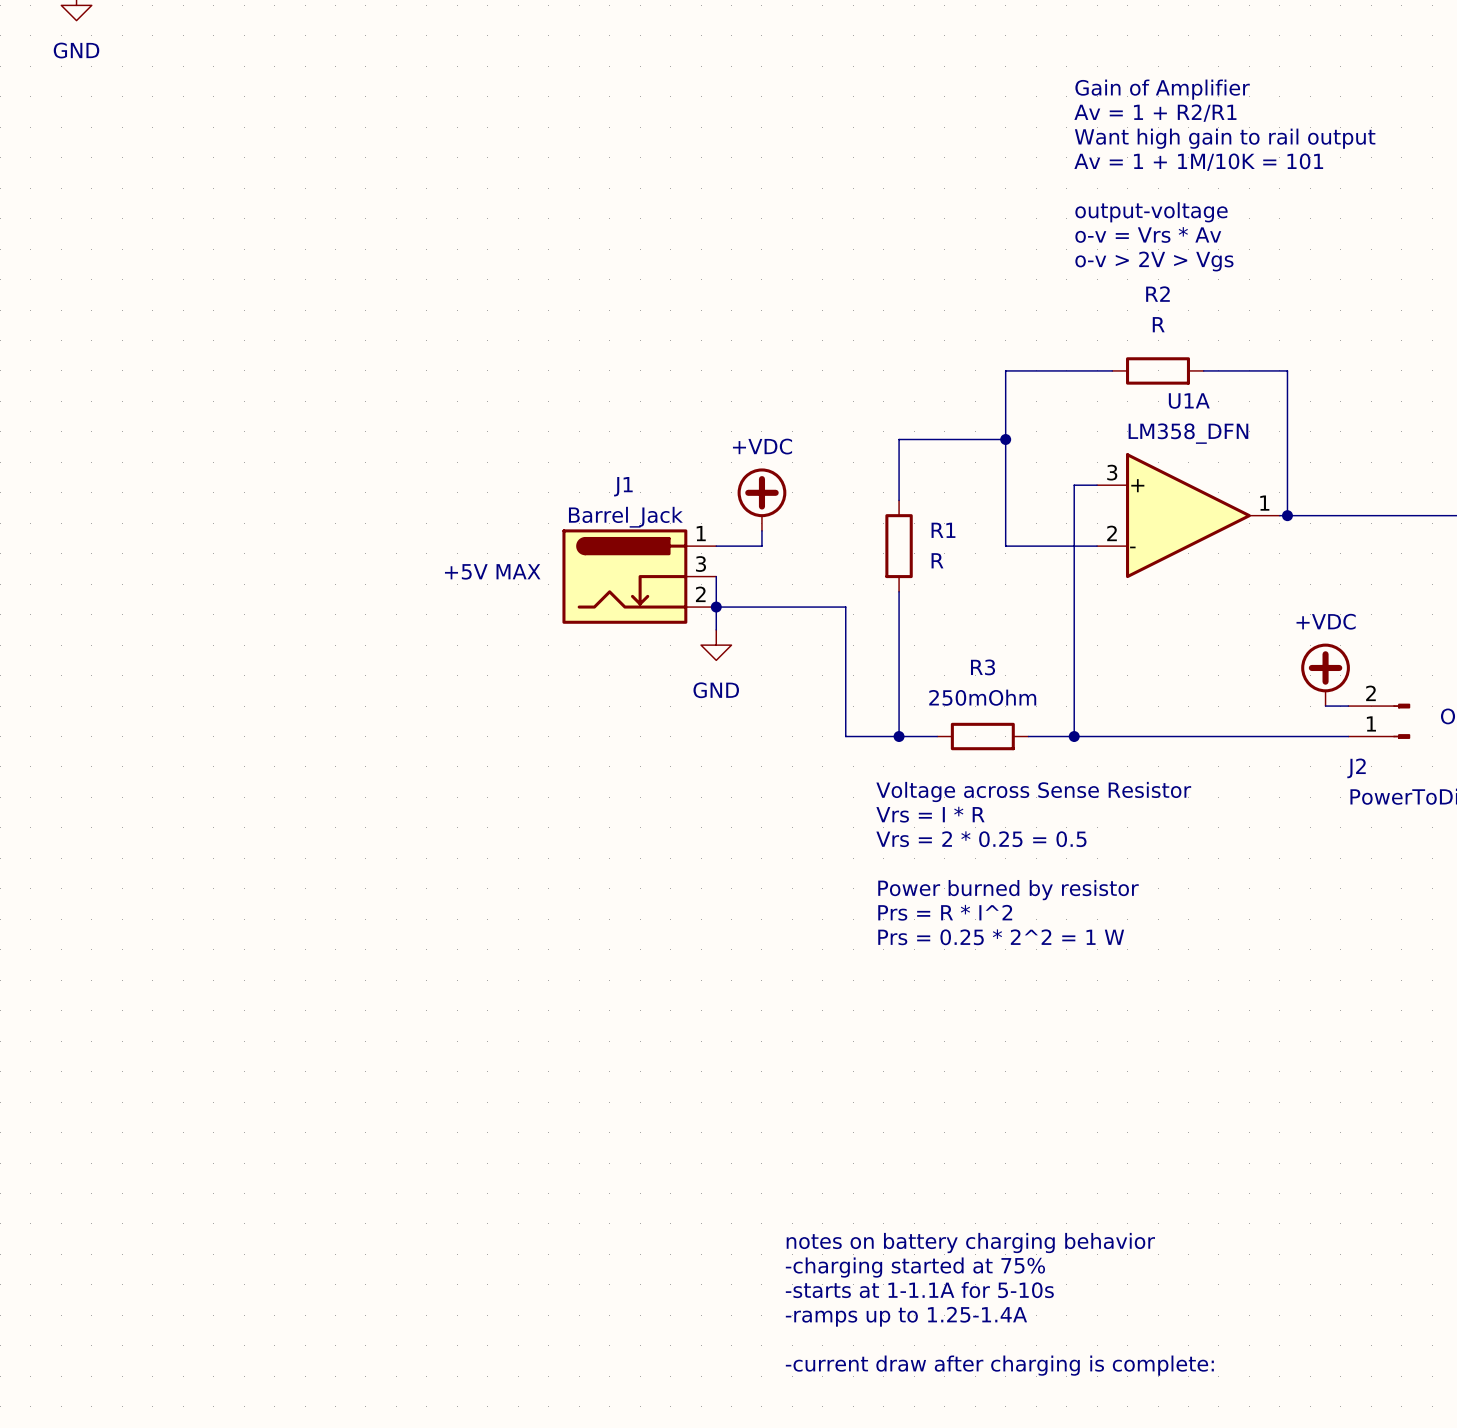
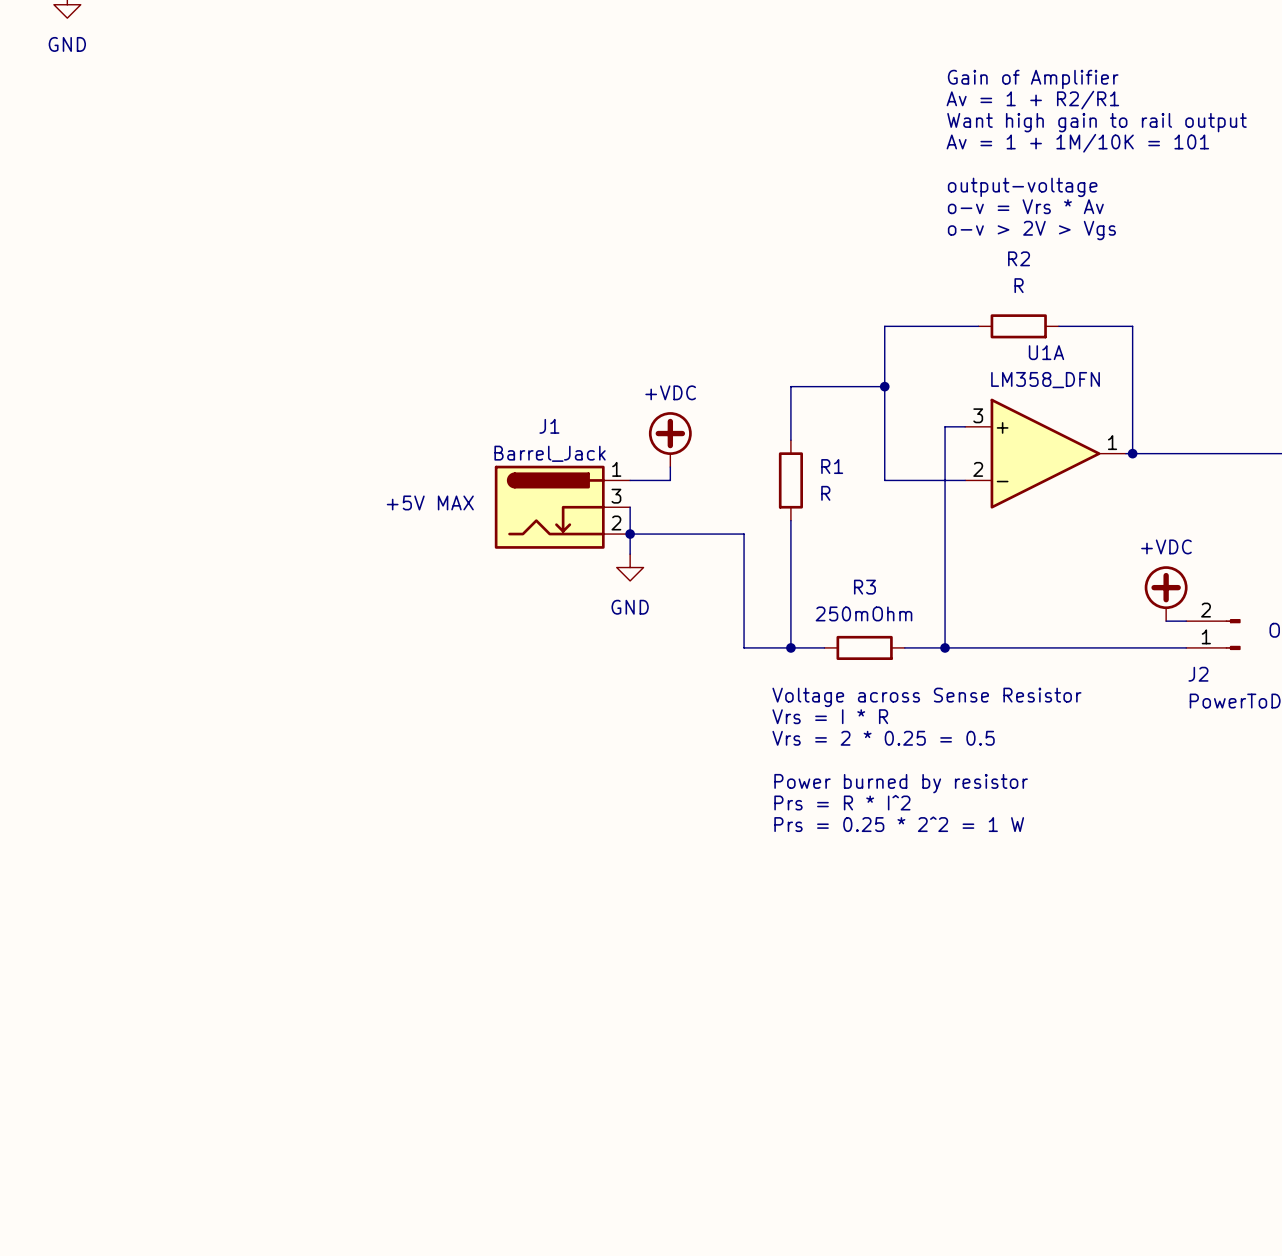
text: notes on battery charging behavior (970, 1243) -> none
text: -charging started at 75% (915, 1267) -> none
text: -starts at 1-1.1A for 5-10s (919, 1290) -> none
text: -ramps up to 1.25-1.4A (906, 1316) -> none
text: -current draw after charging is complete: (999, 1365) -> none

